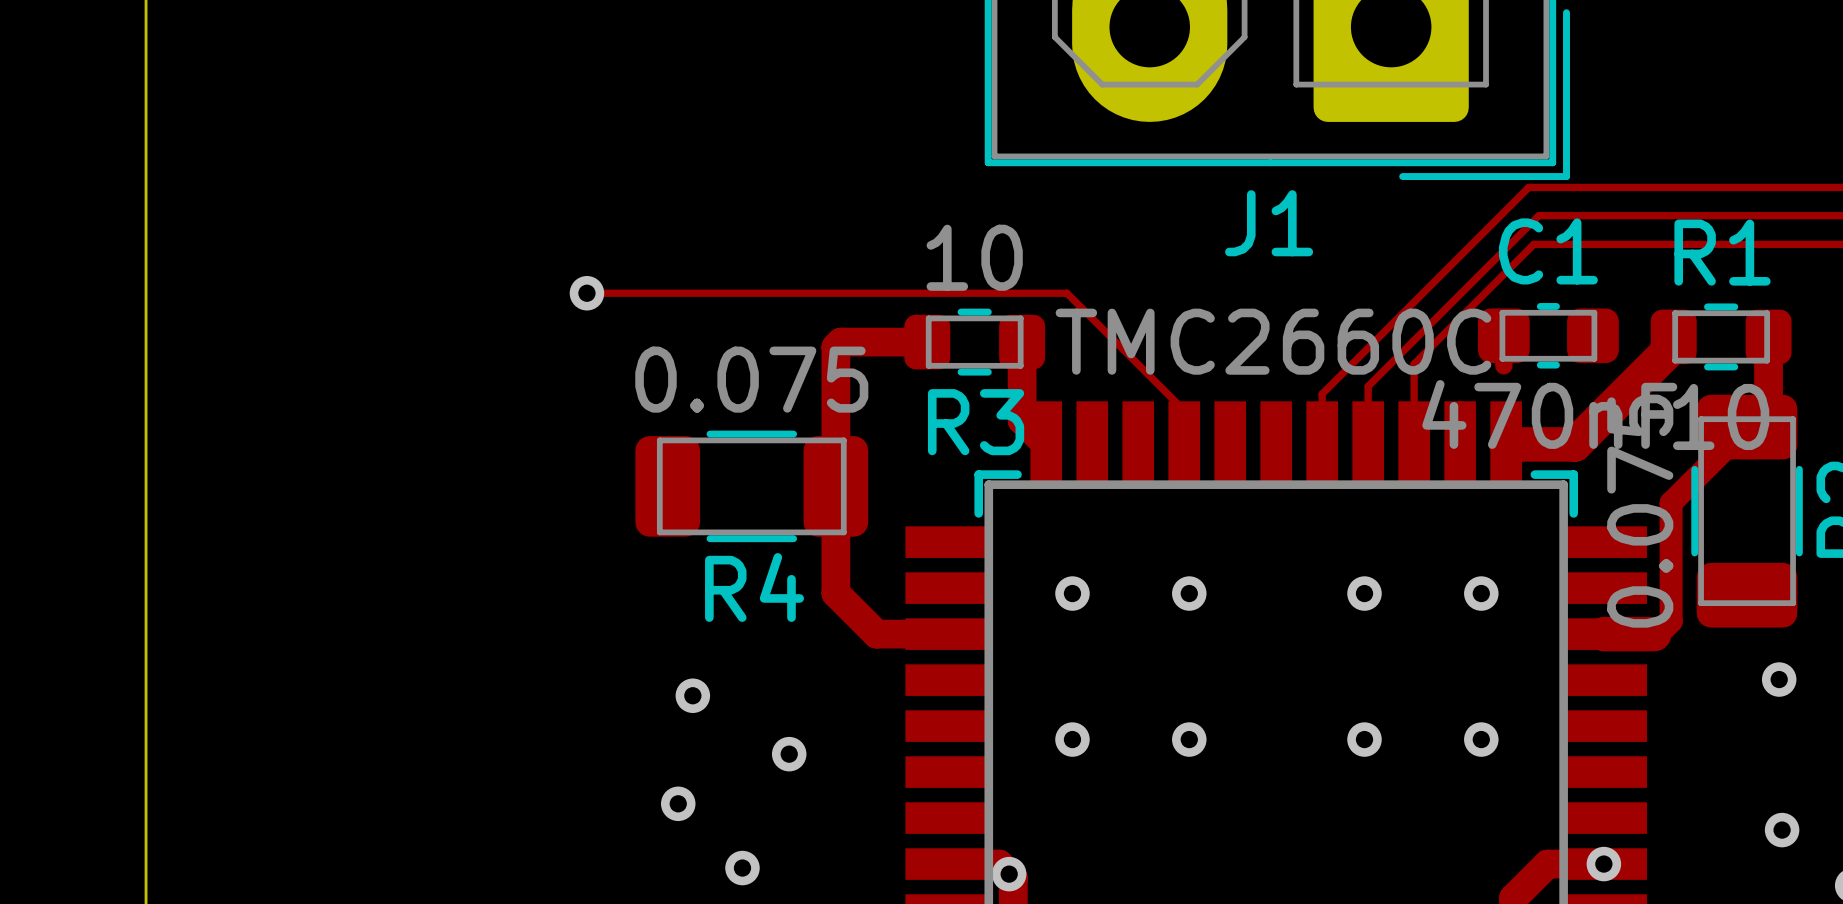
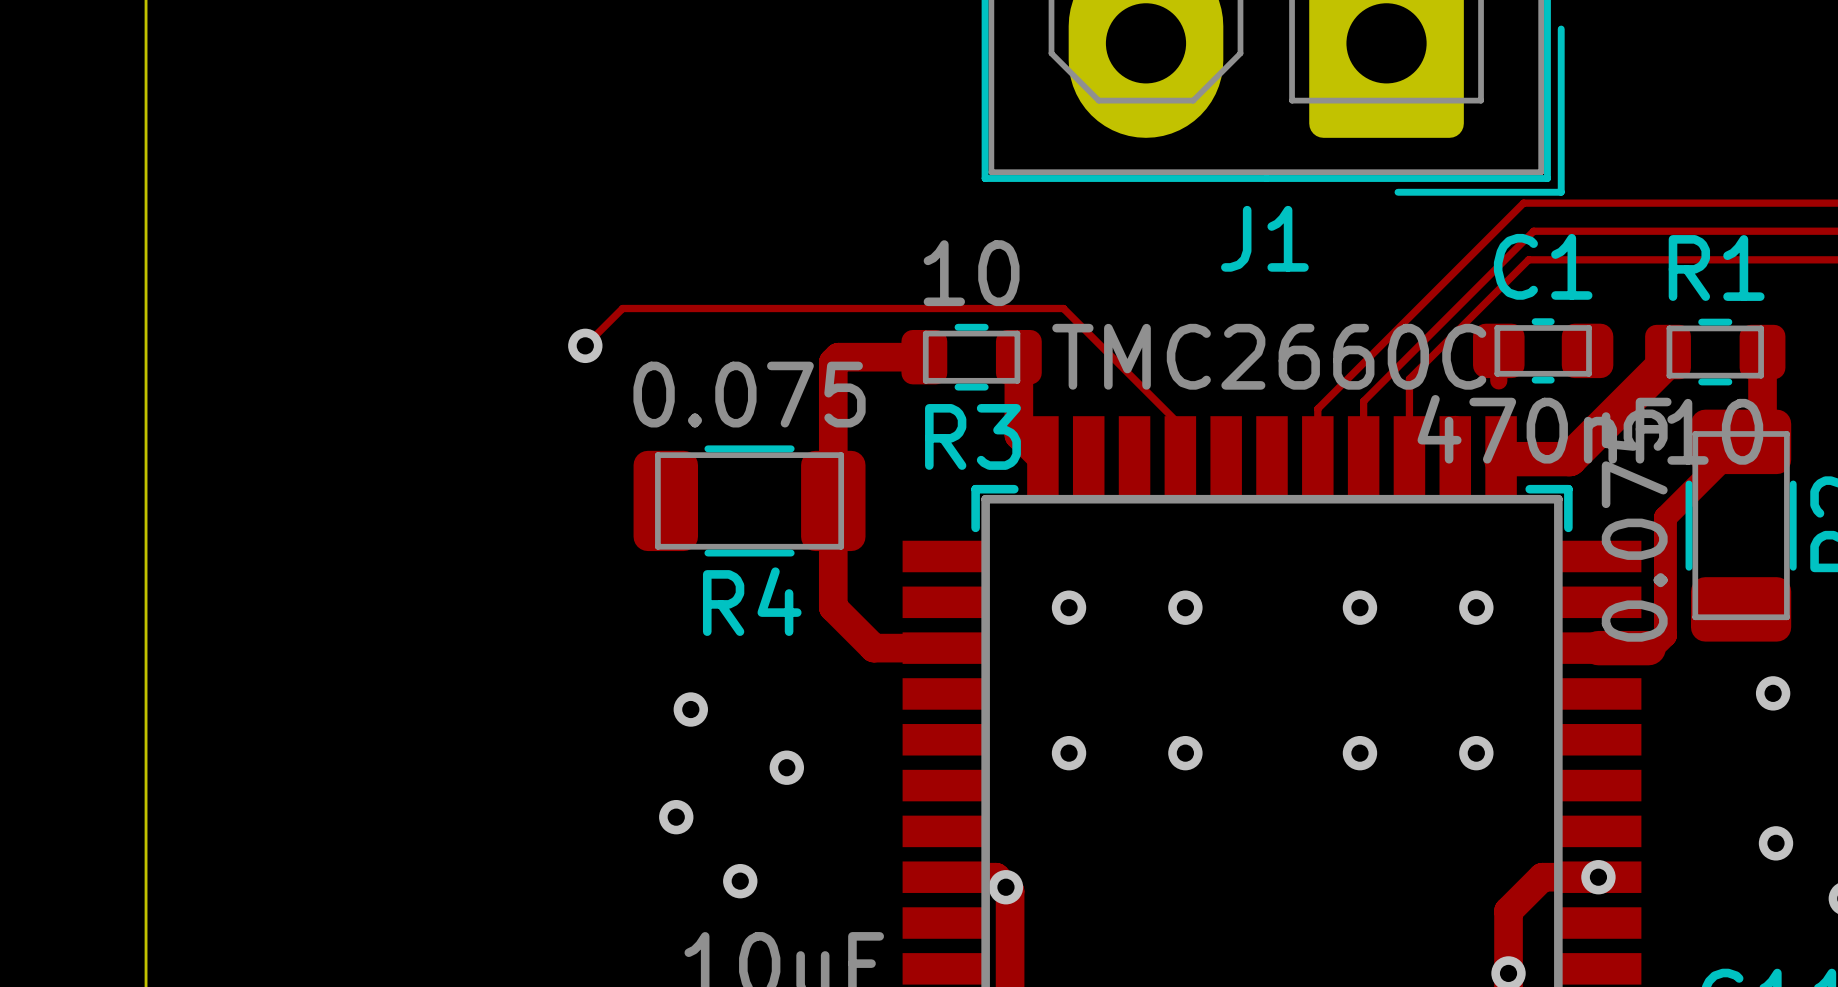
track: (586, 293) (624, 293) -> (585, 345) (622, 308)
via position: (586, 293) -> (585, 345)

